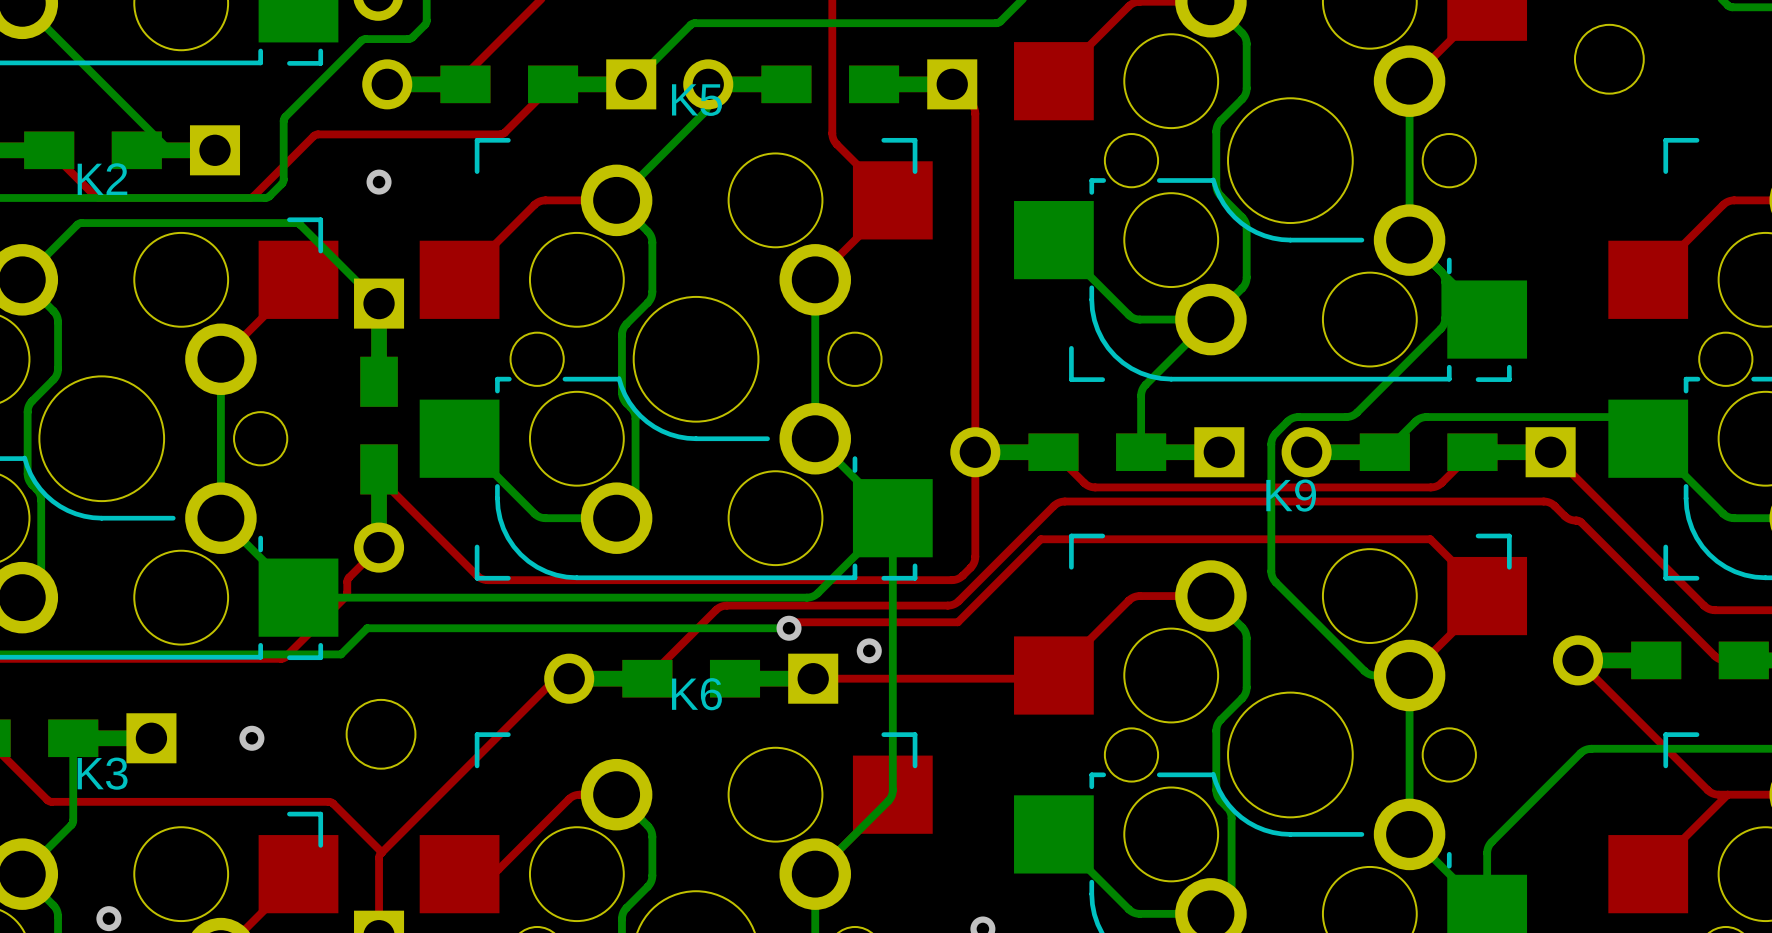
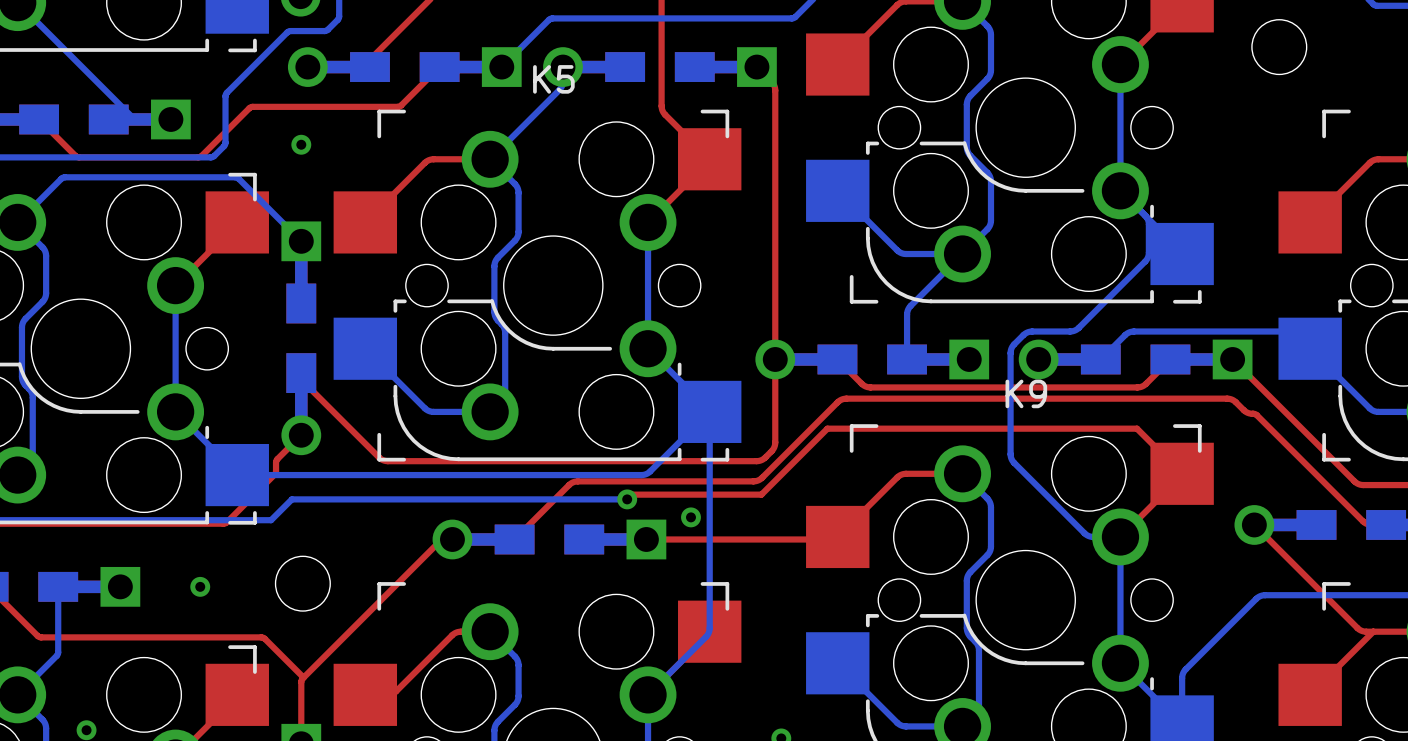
K2 name: K2 (102, 179) -> none
K6 name: K6 (696, 694) -> none
K3 name: K3 (102, 773) -> none

